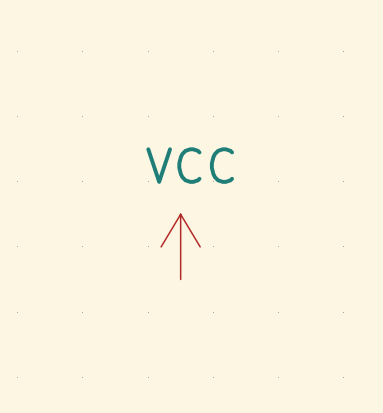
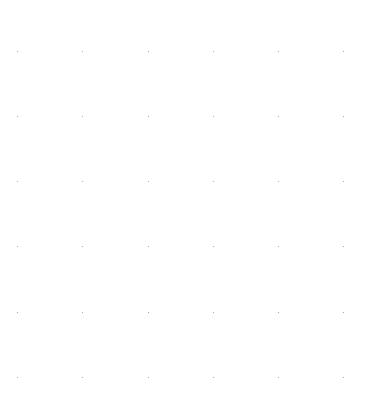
power symbol: VCC (180, 246) -> none

